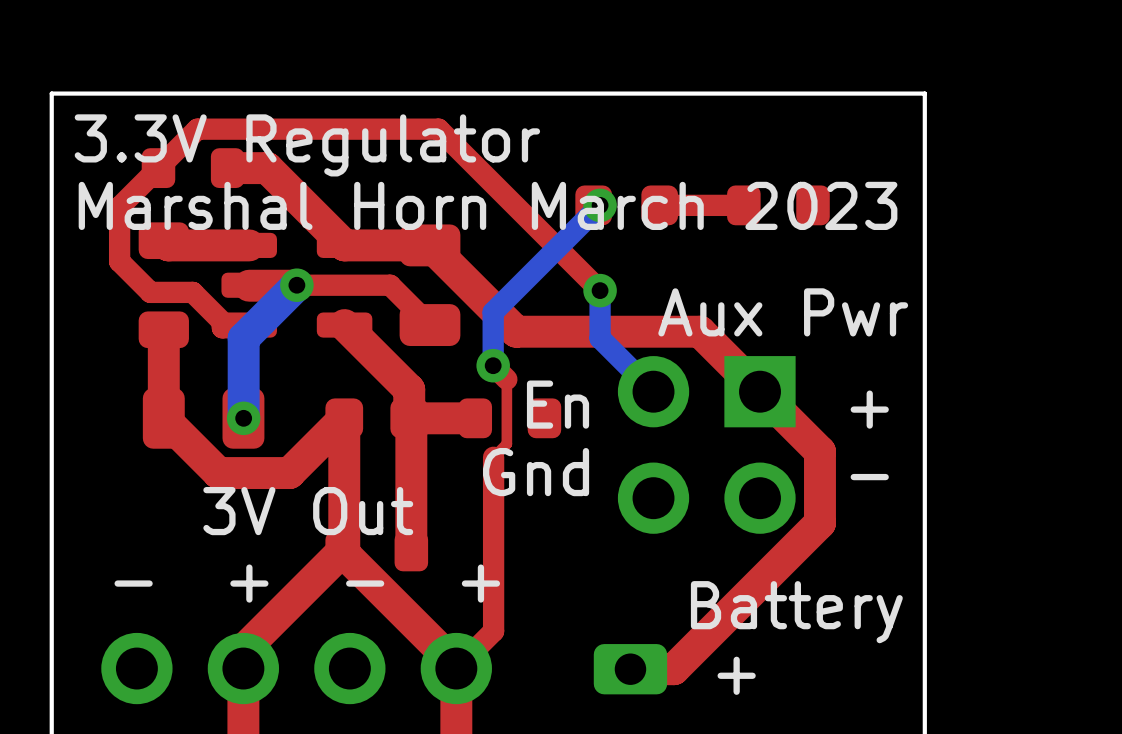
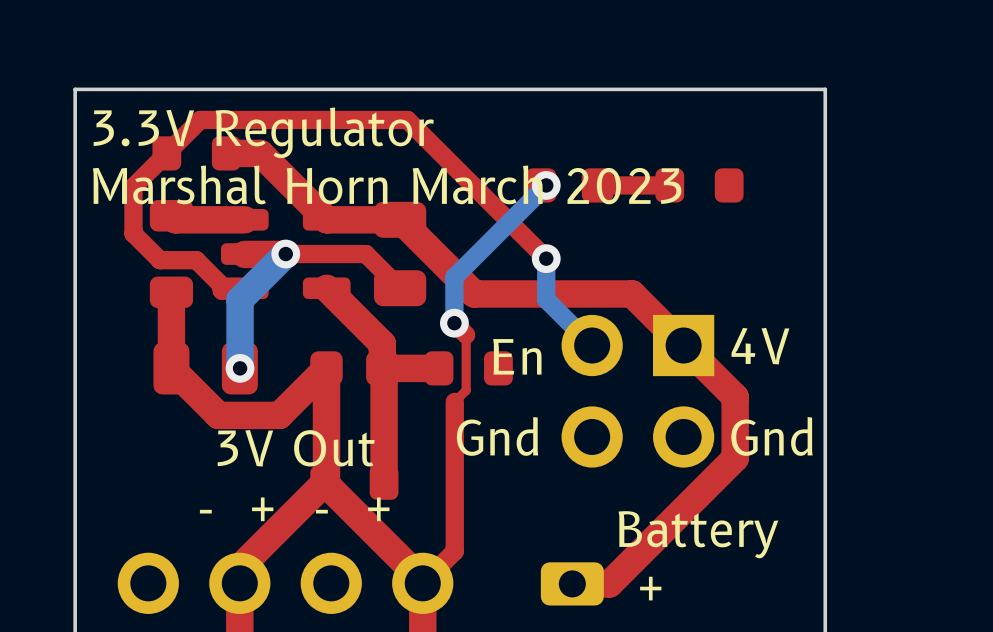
text: Aux Pwr (783, 312) -> none
text: + (869, 409) -> 4V (760, 346)
text position: Gnd (536, 472) -> Gnd (497, 436)
text: - (869, 477) -> Gnd (771, 436)

